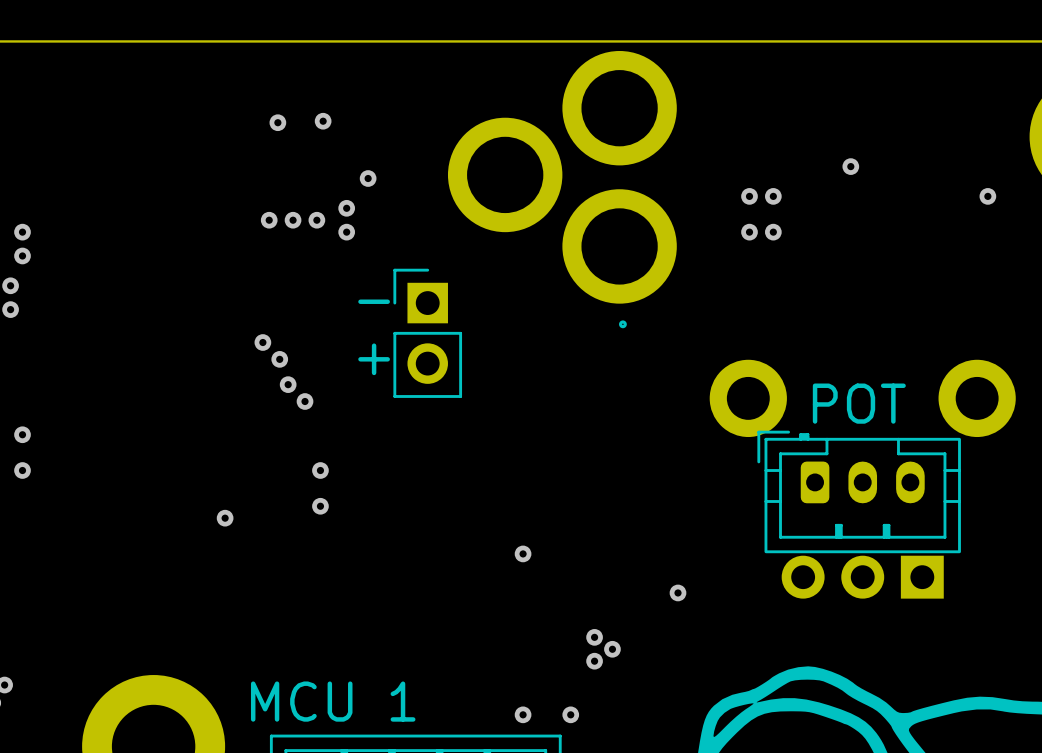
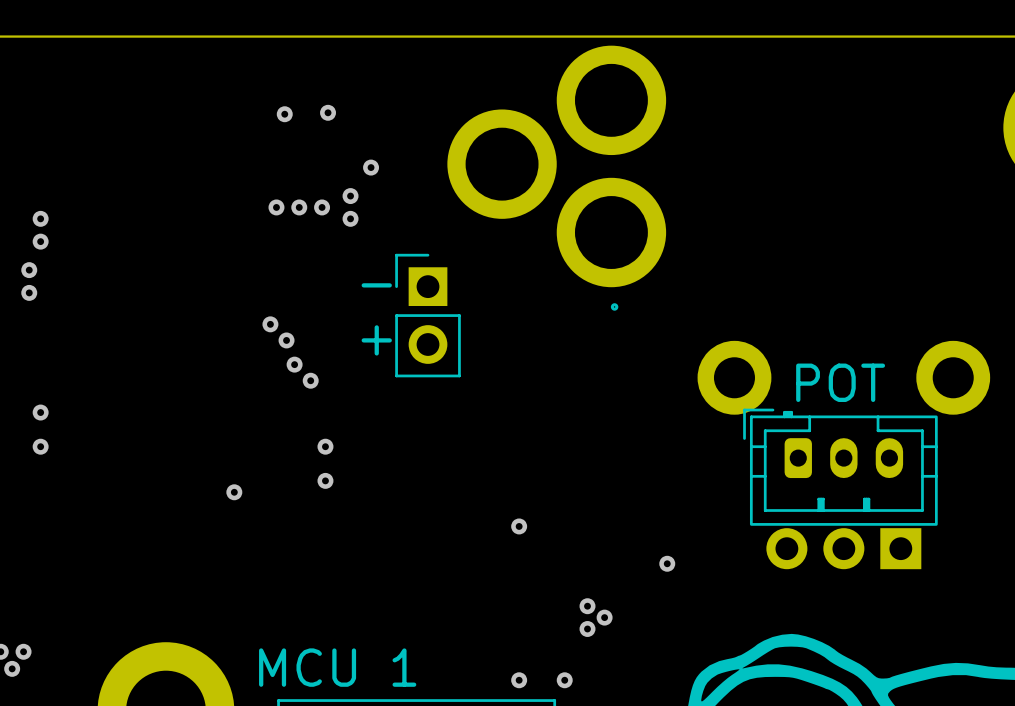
via: (850, 166) -> none
via: (749, 196) -> none
via: (773, 196) -> none
via: (987, 196) -> none
via: (749, 232) -> none
via: (773, 232) -> none

